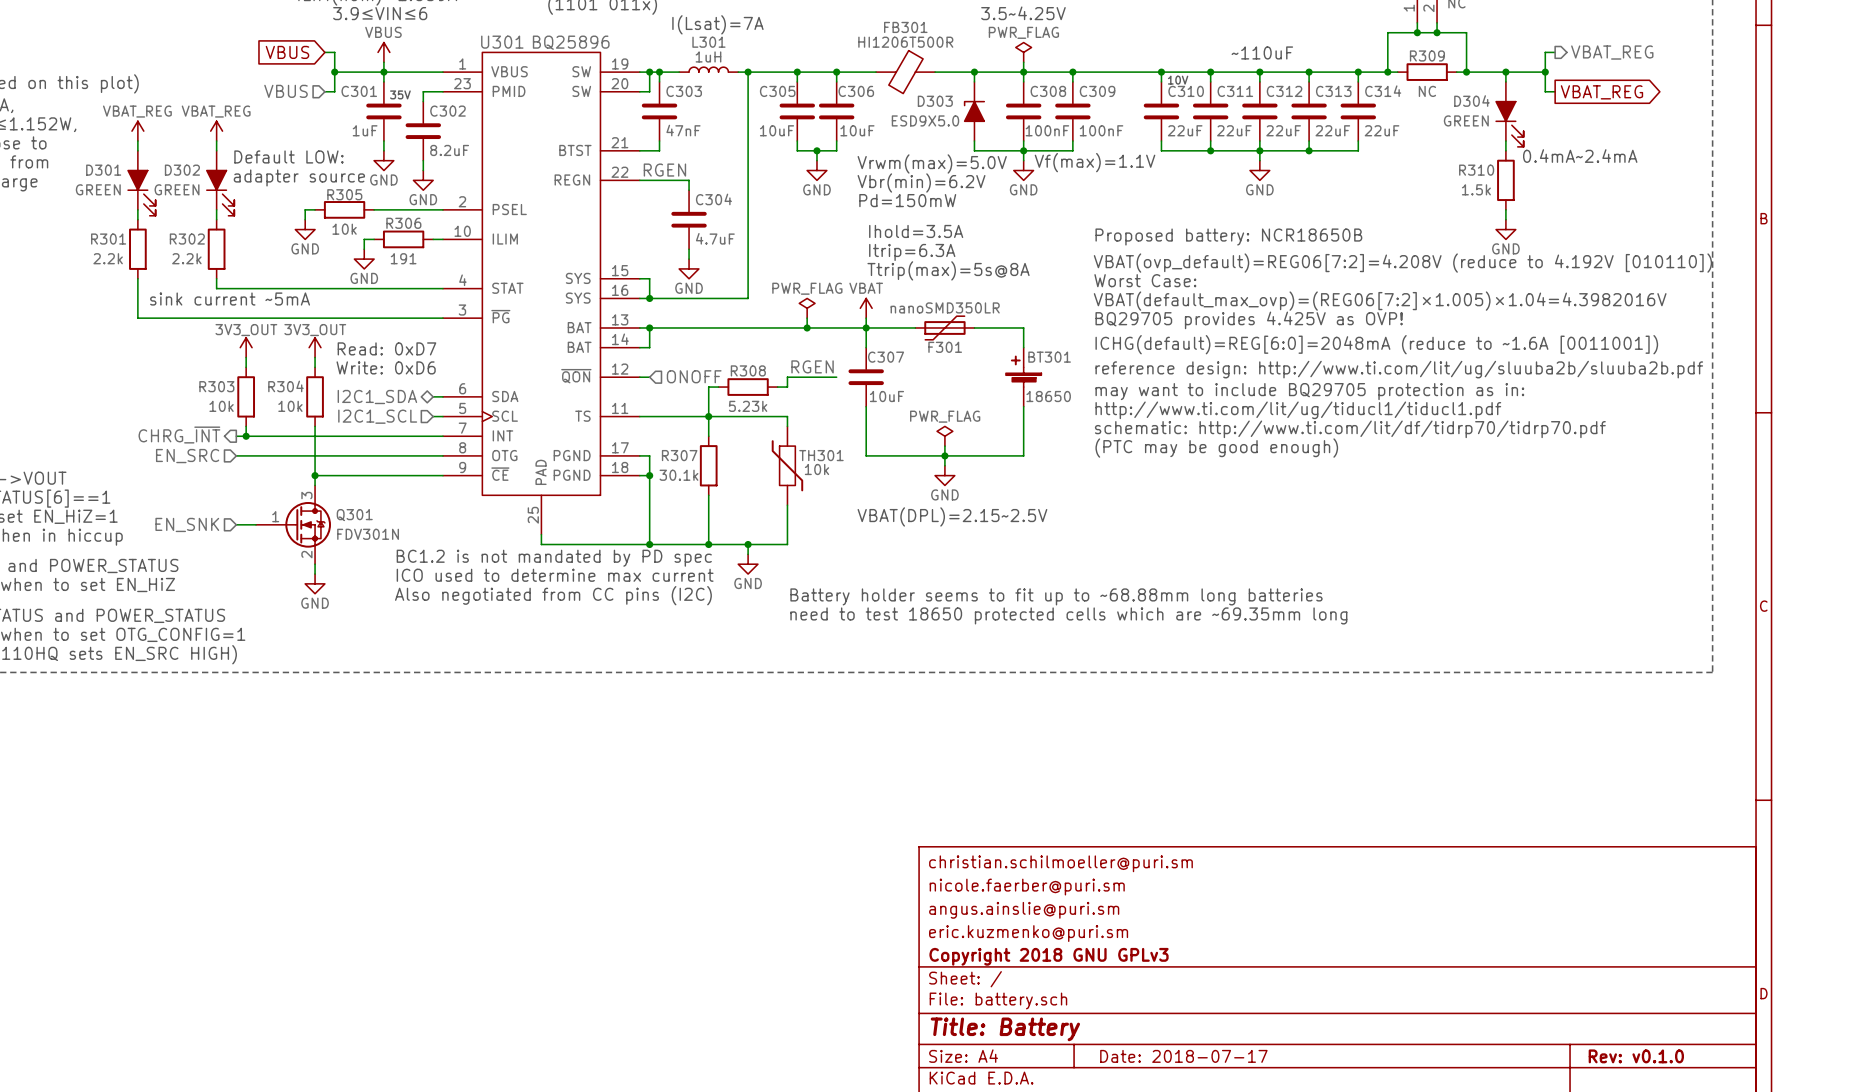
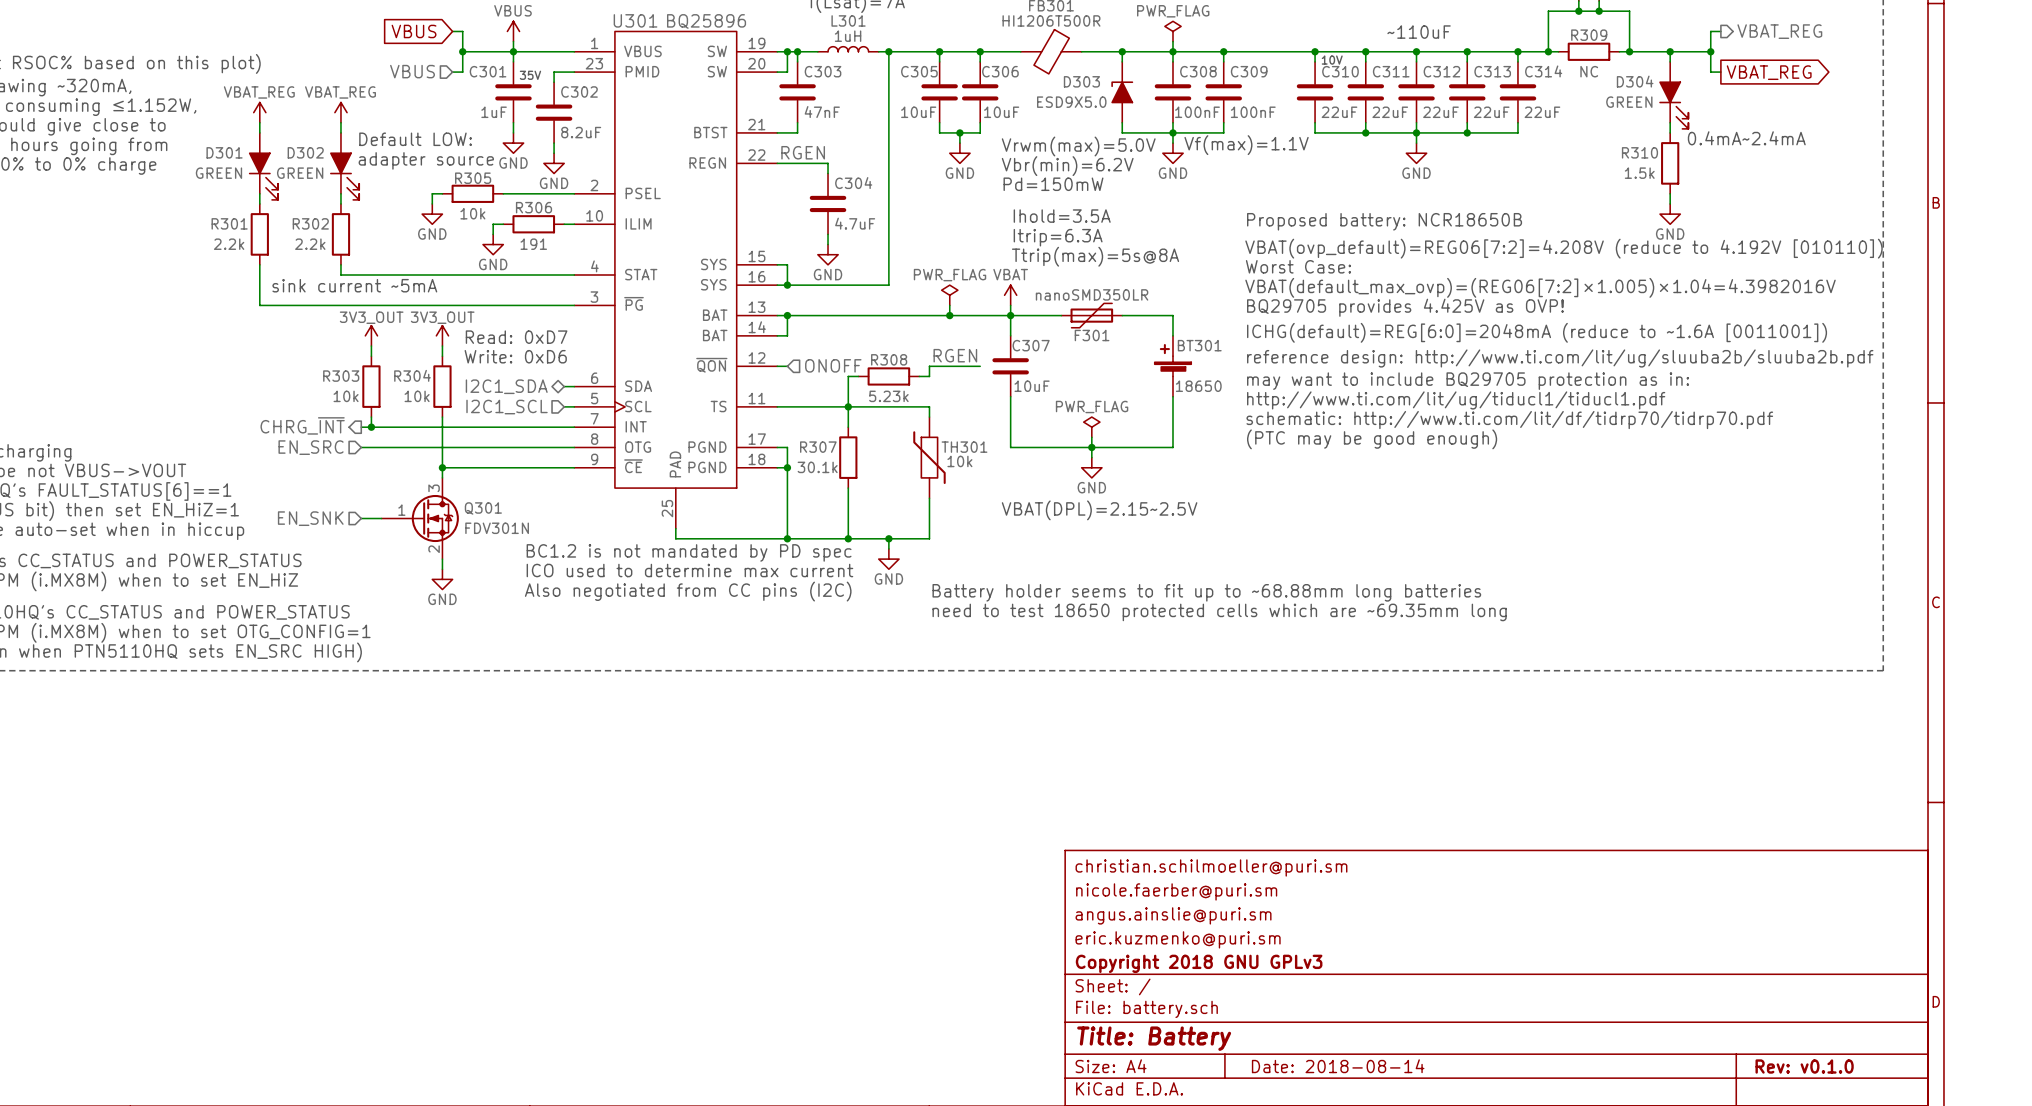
title block: Date: 2018-07-17 (1183, 1056) -> Date: 2018-08-14 (1338, 1066)

